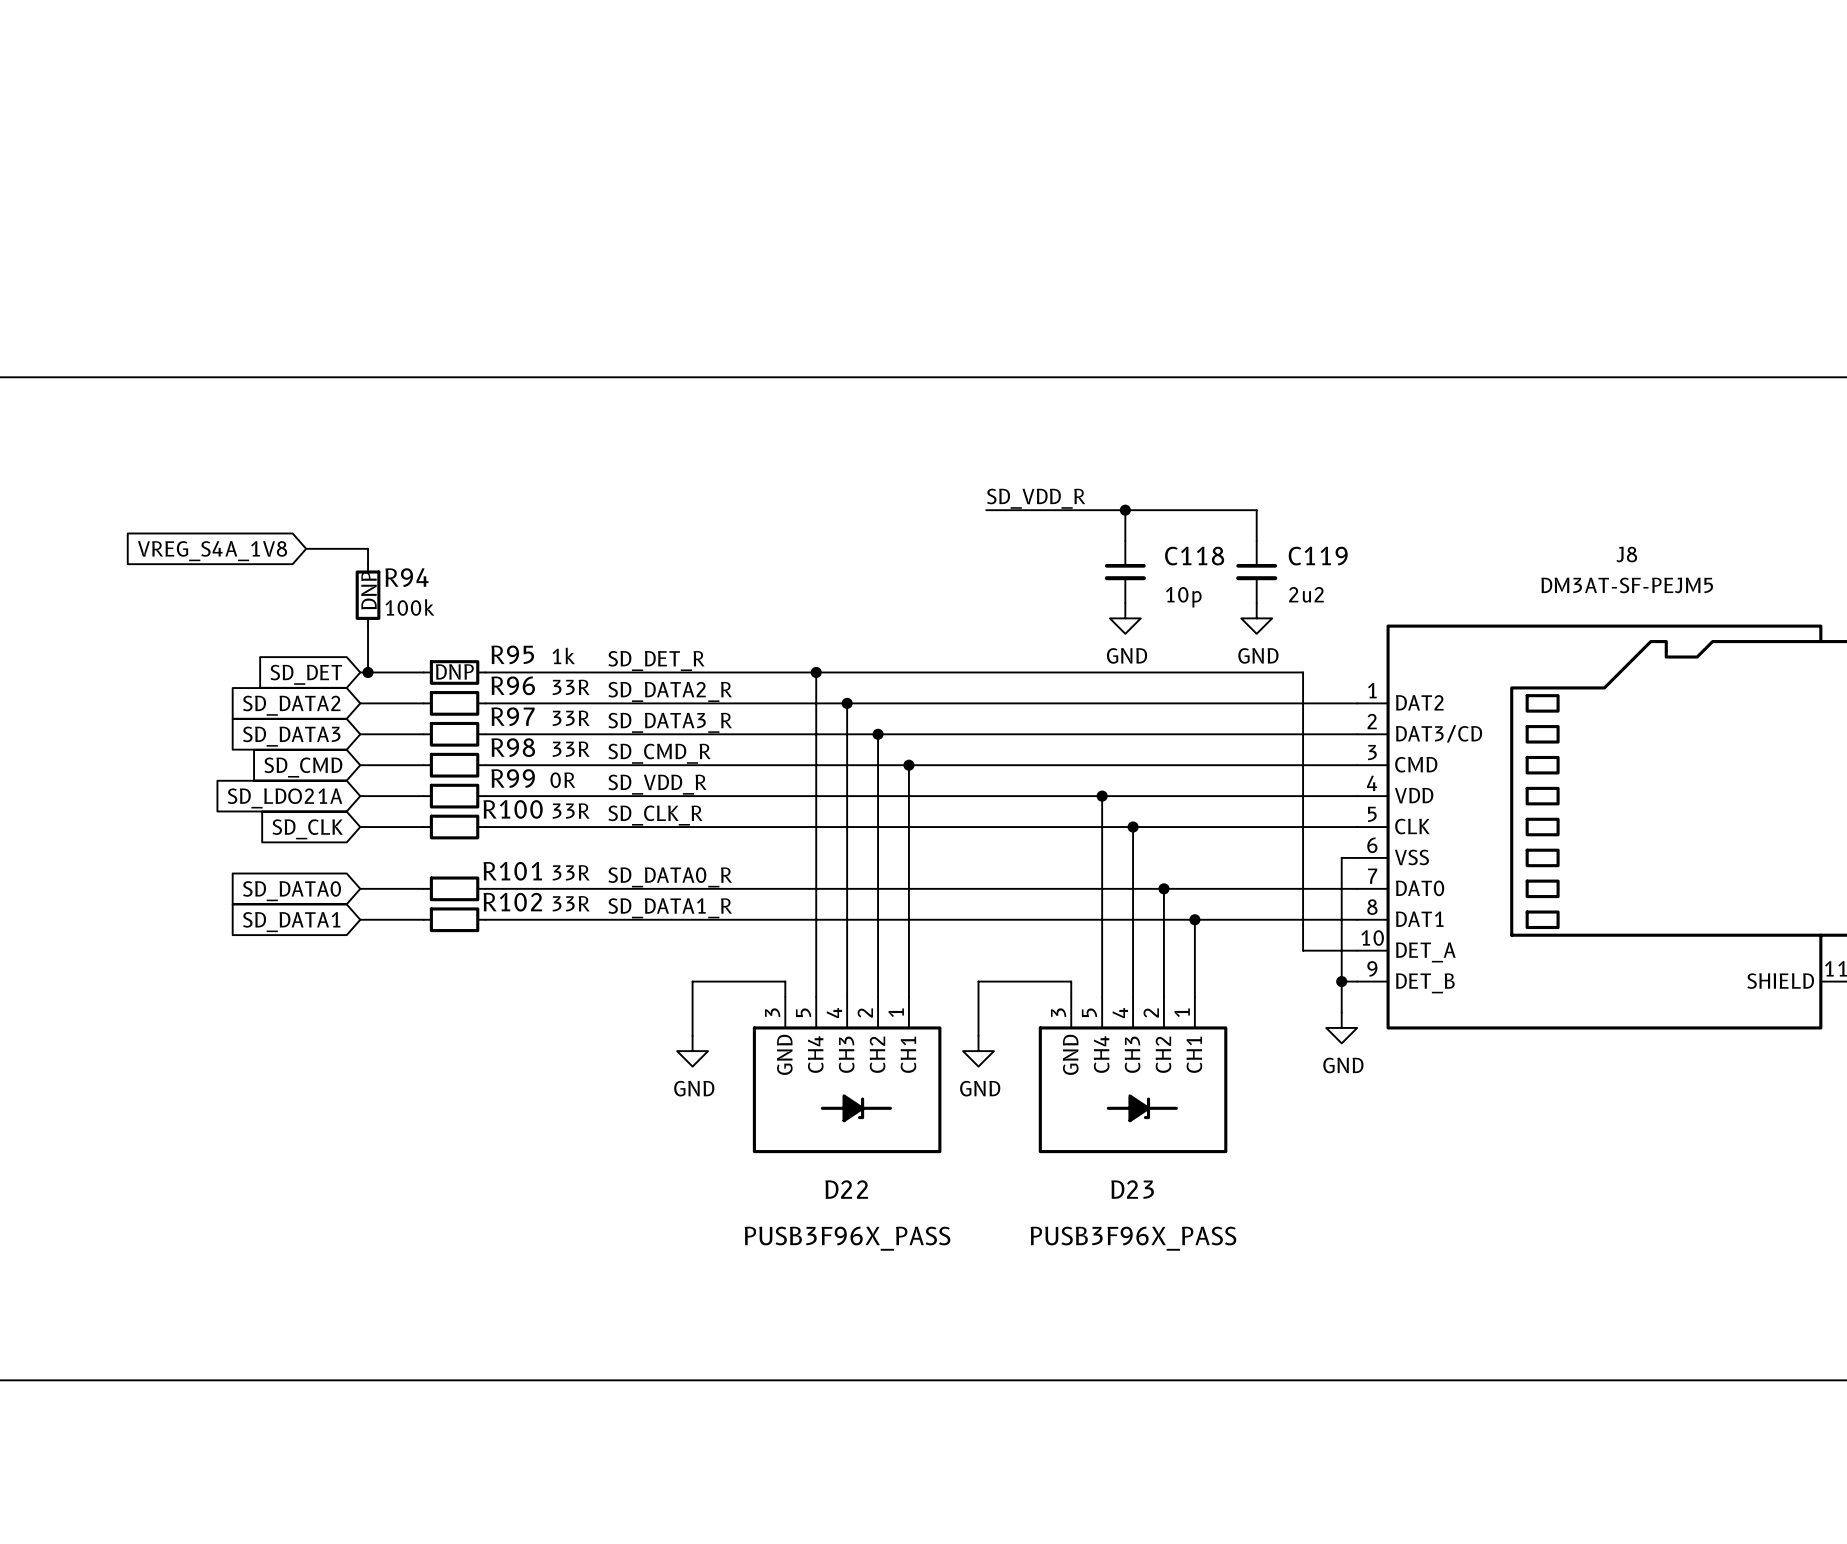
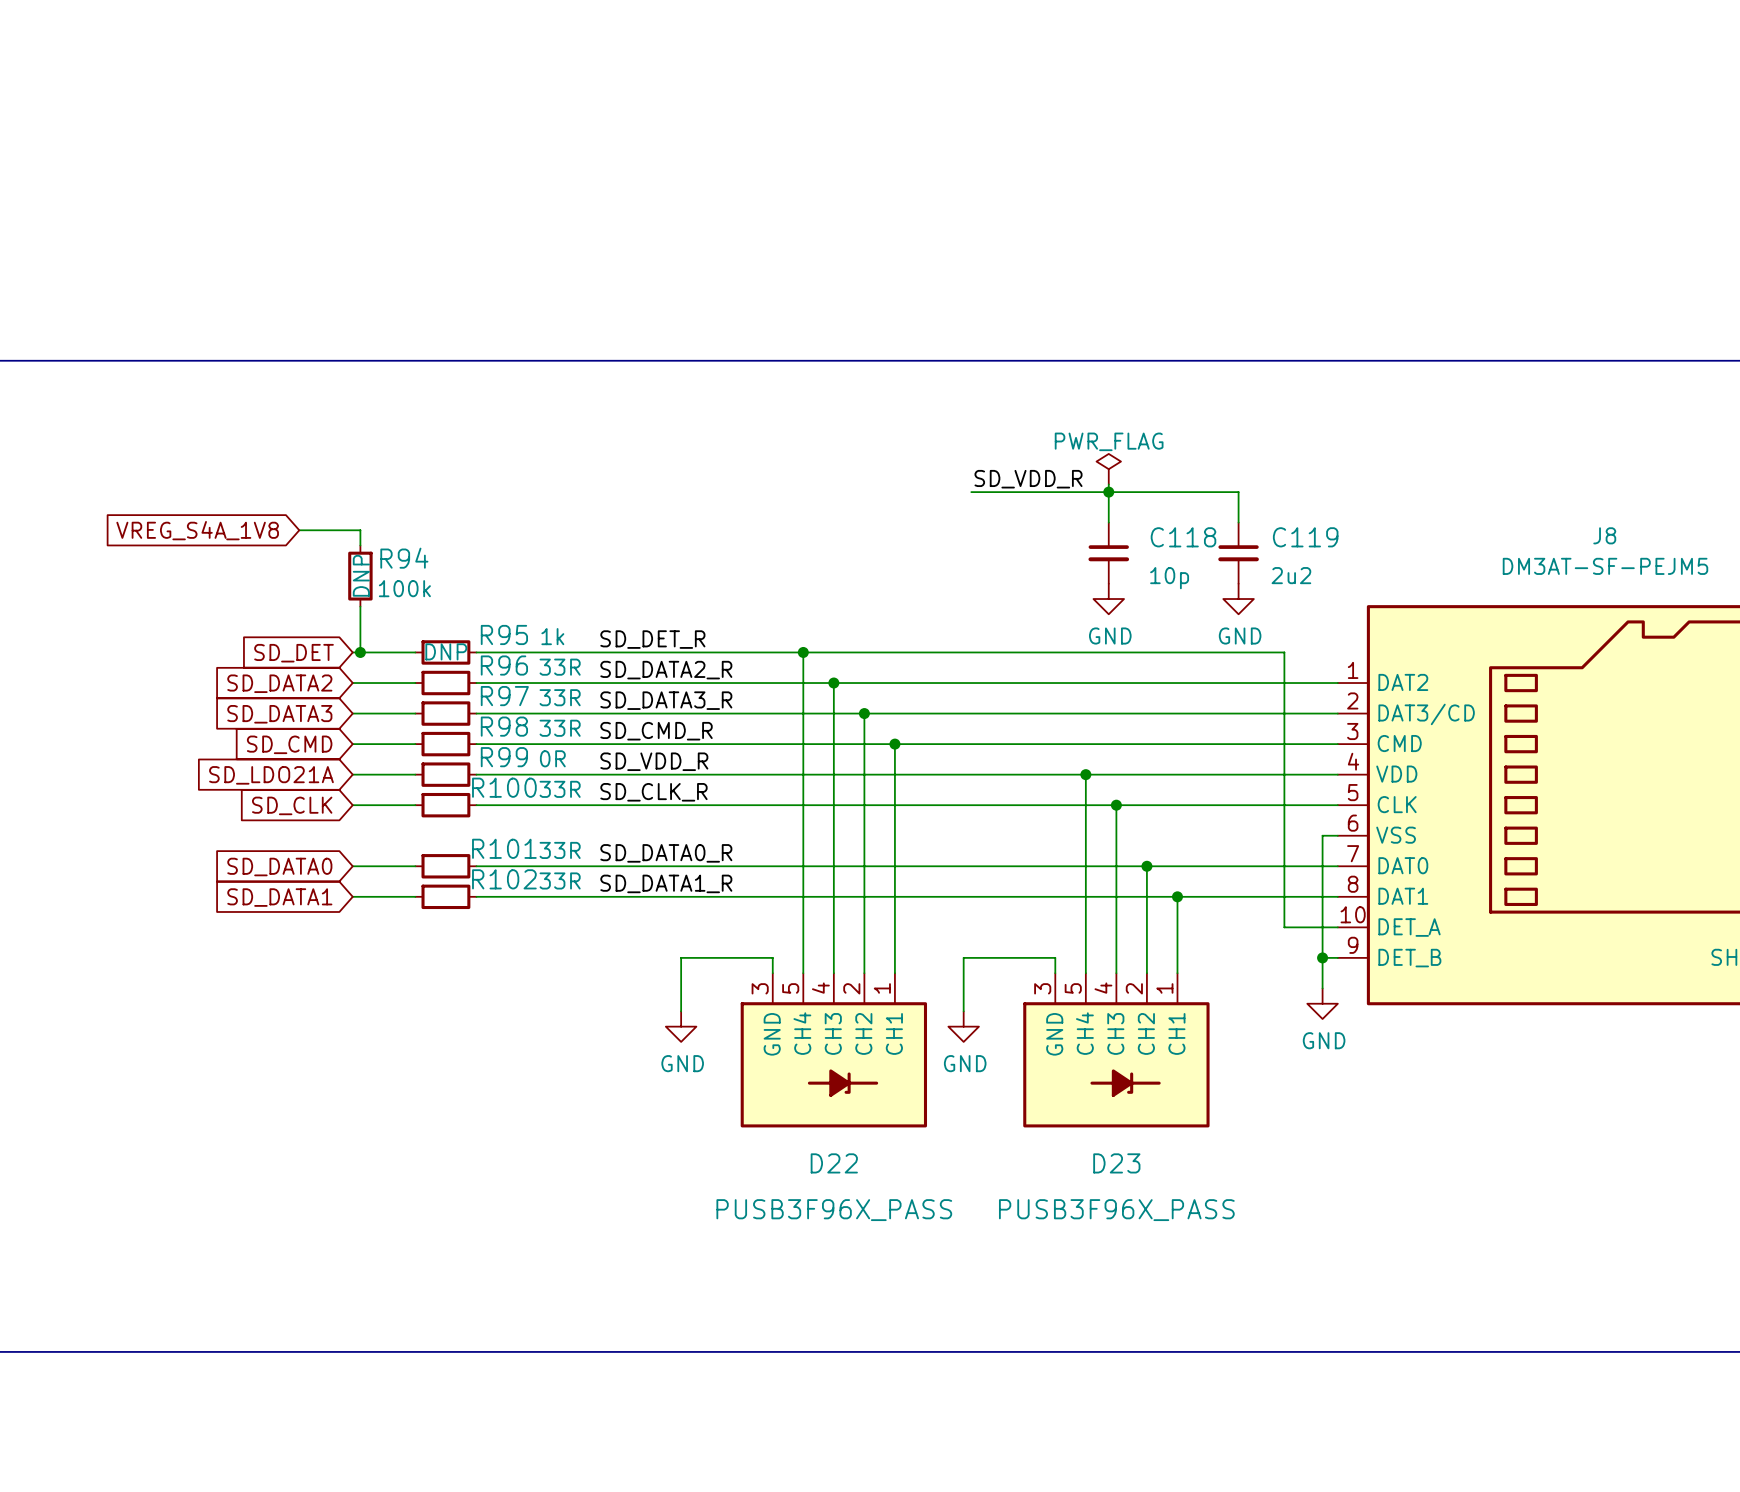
power symbol: none -> PWR_FLAG (1108, 469)

